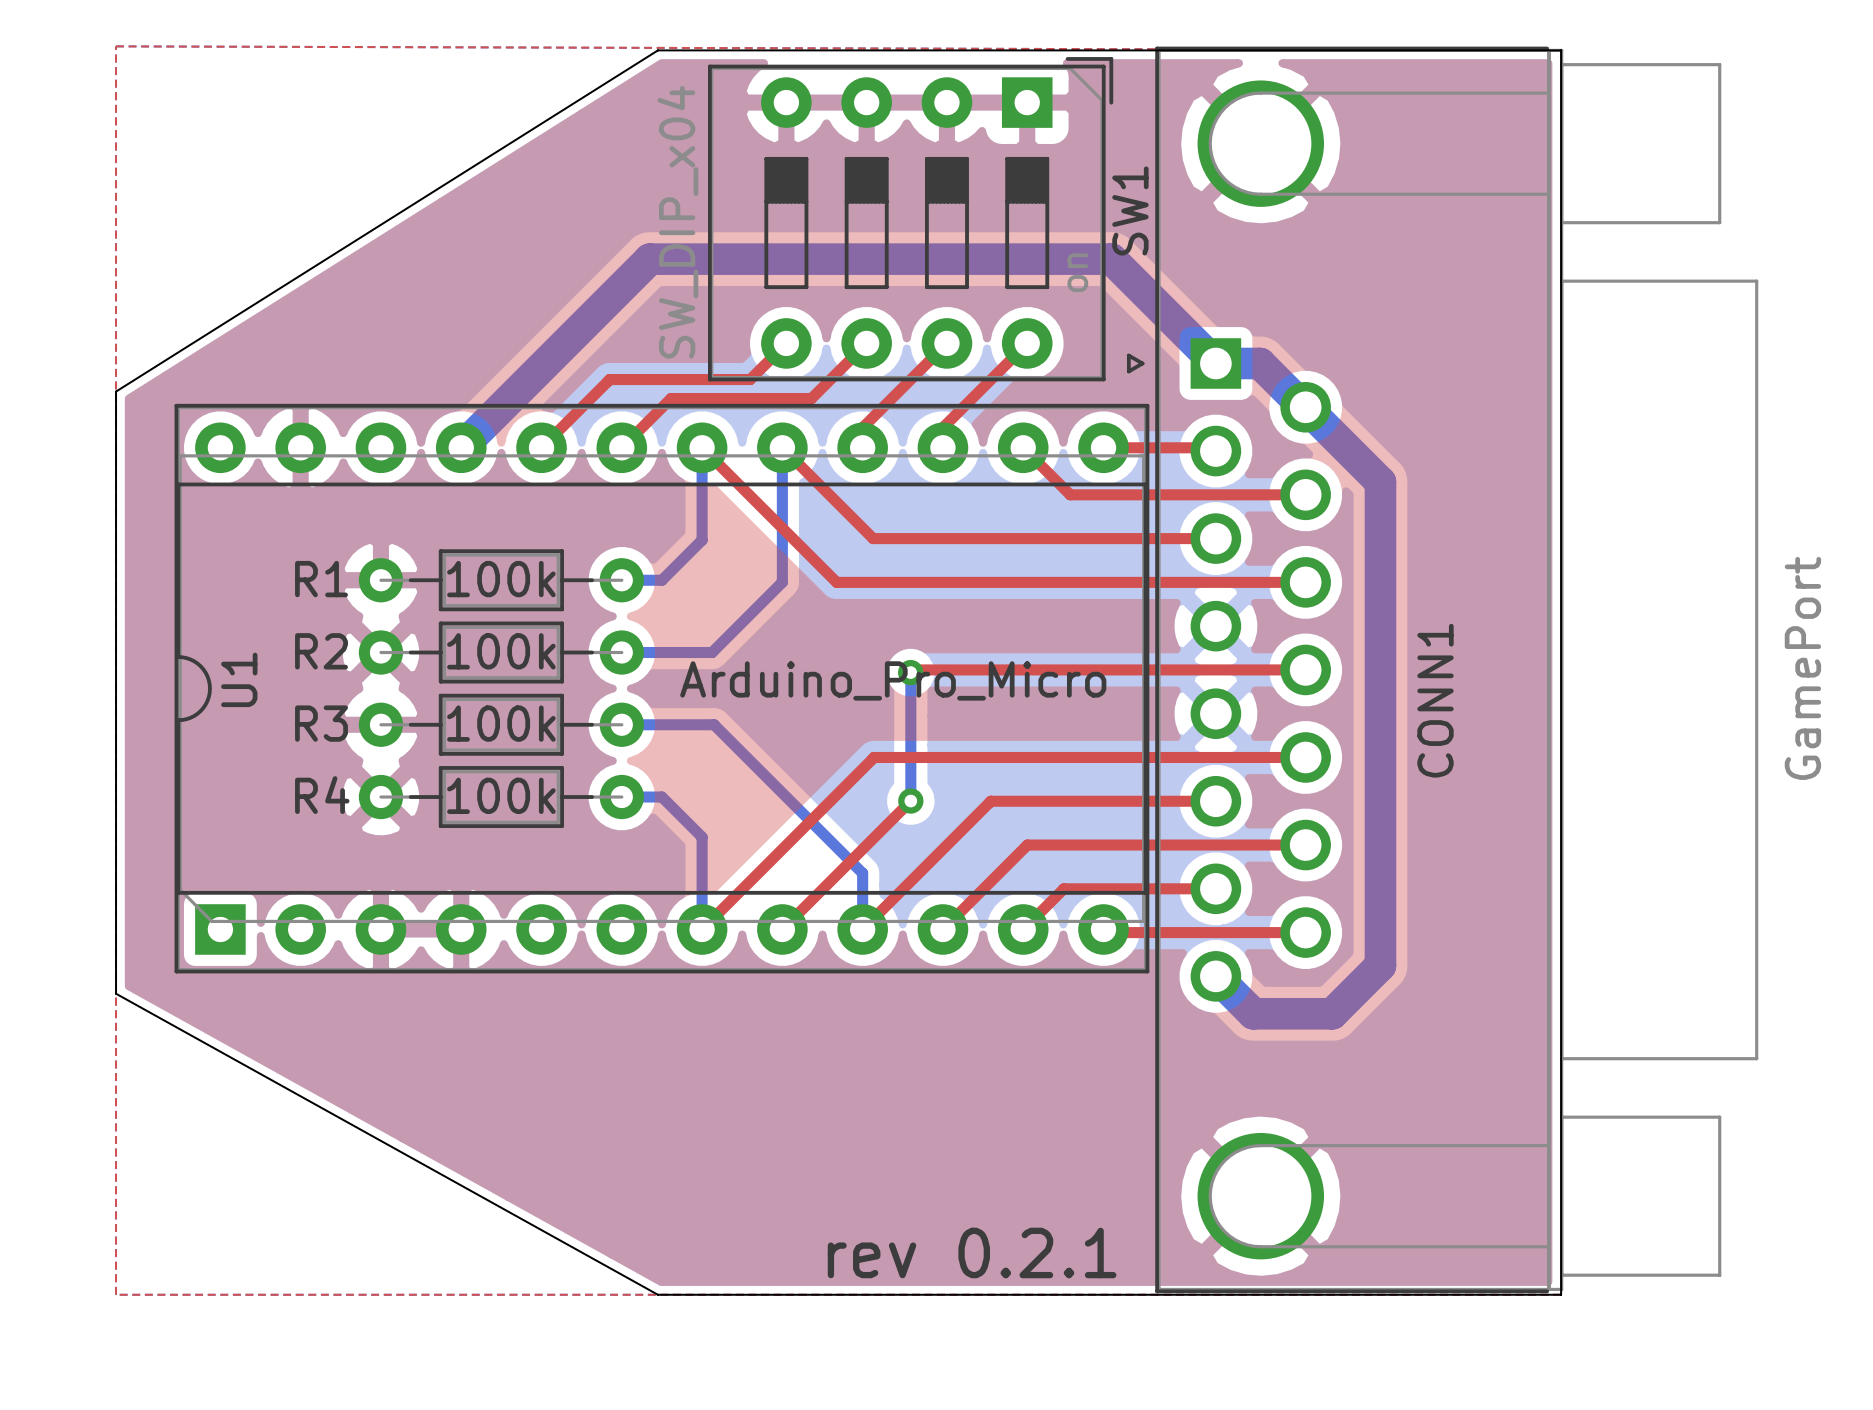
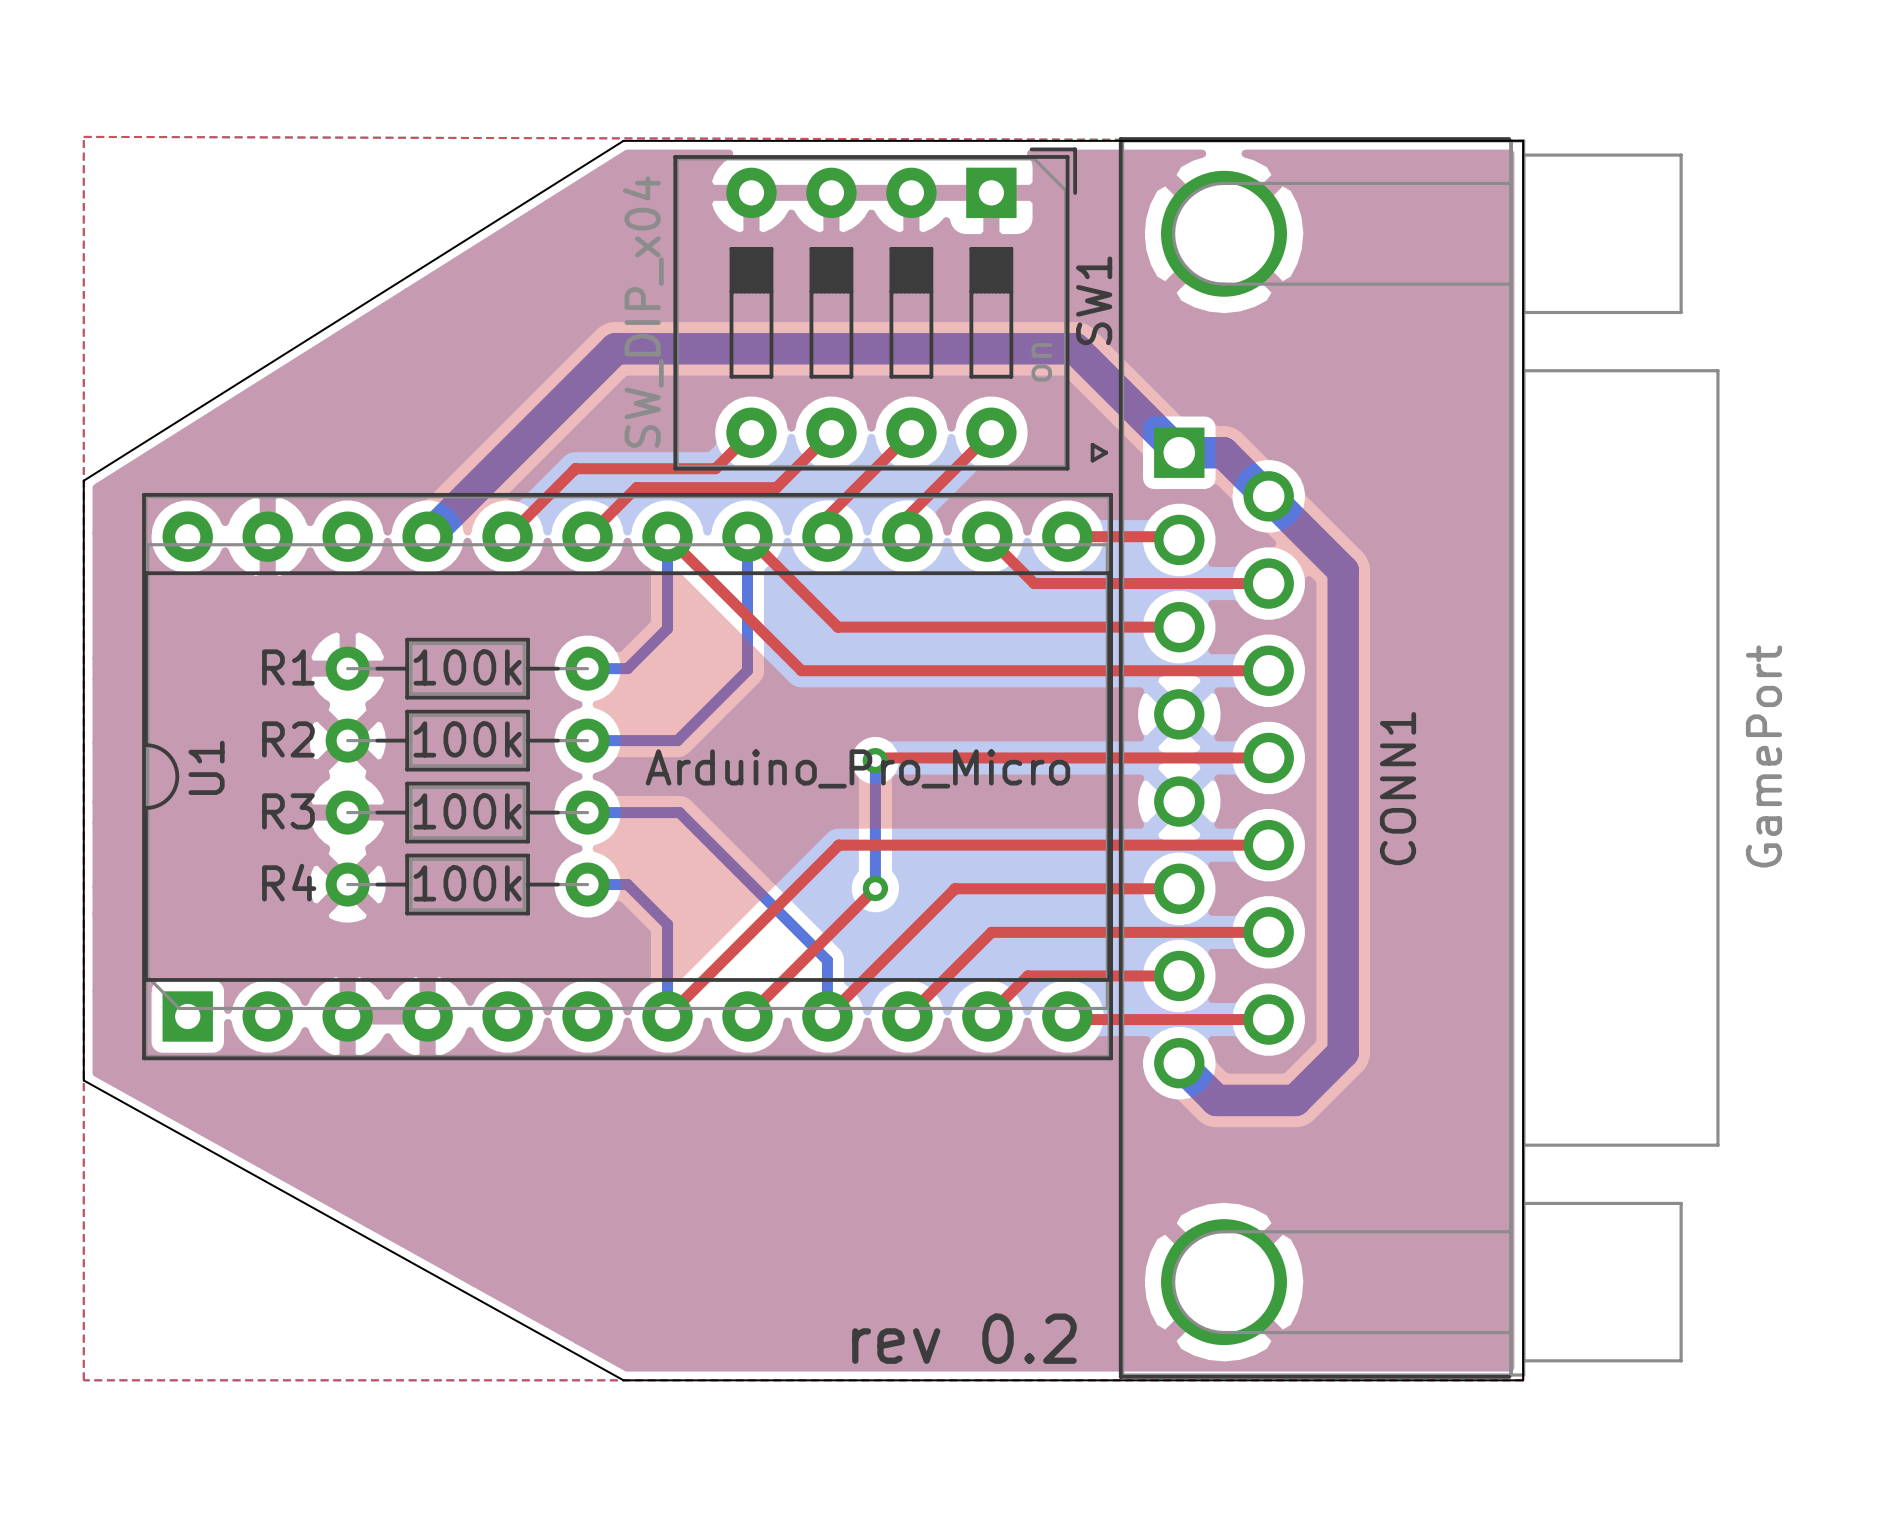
text: rev 0.2.1 (972, 1252) -> rev 0.2 (964, 1338)

